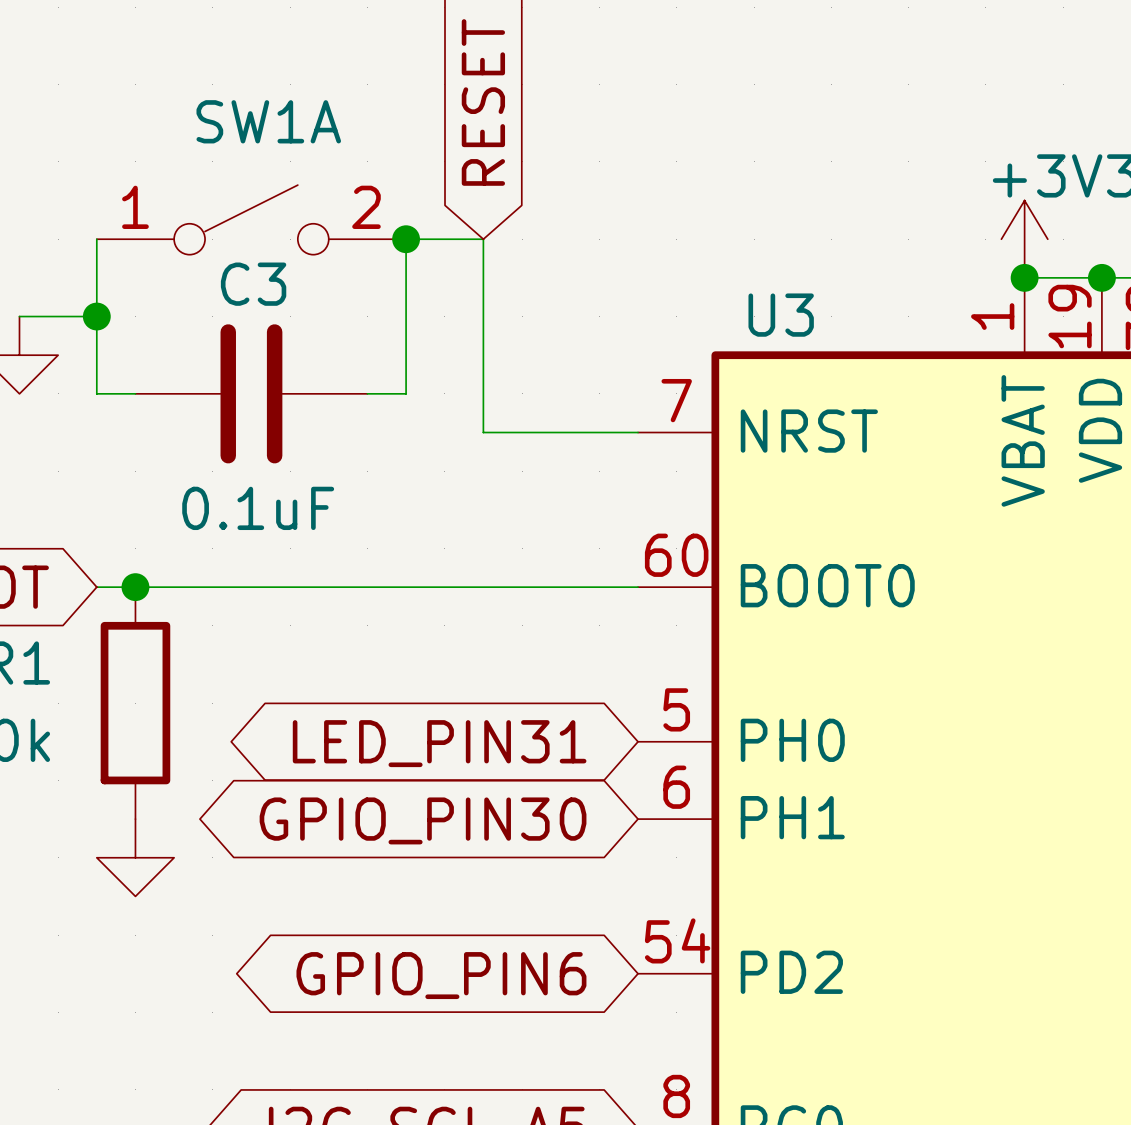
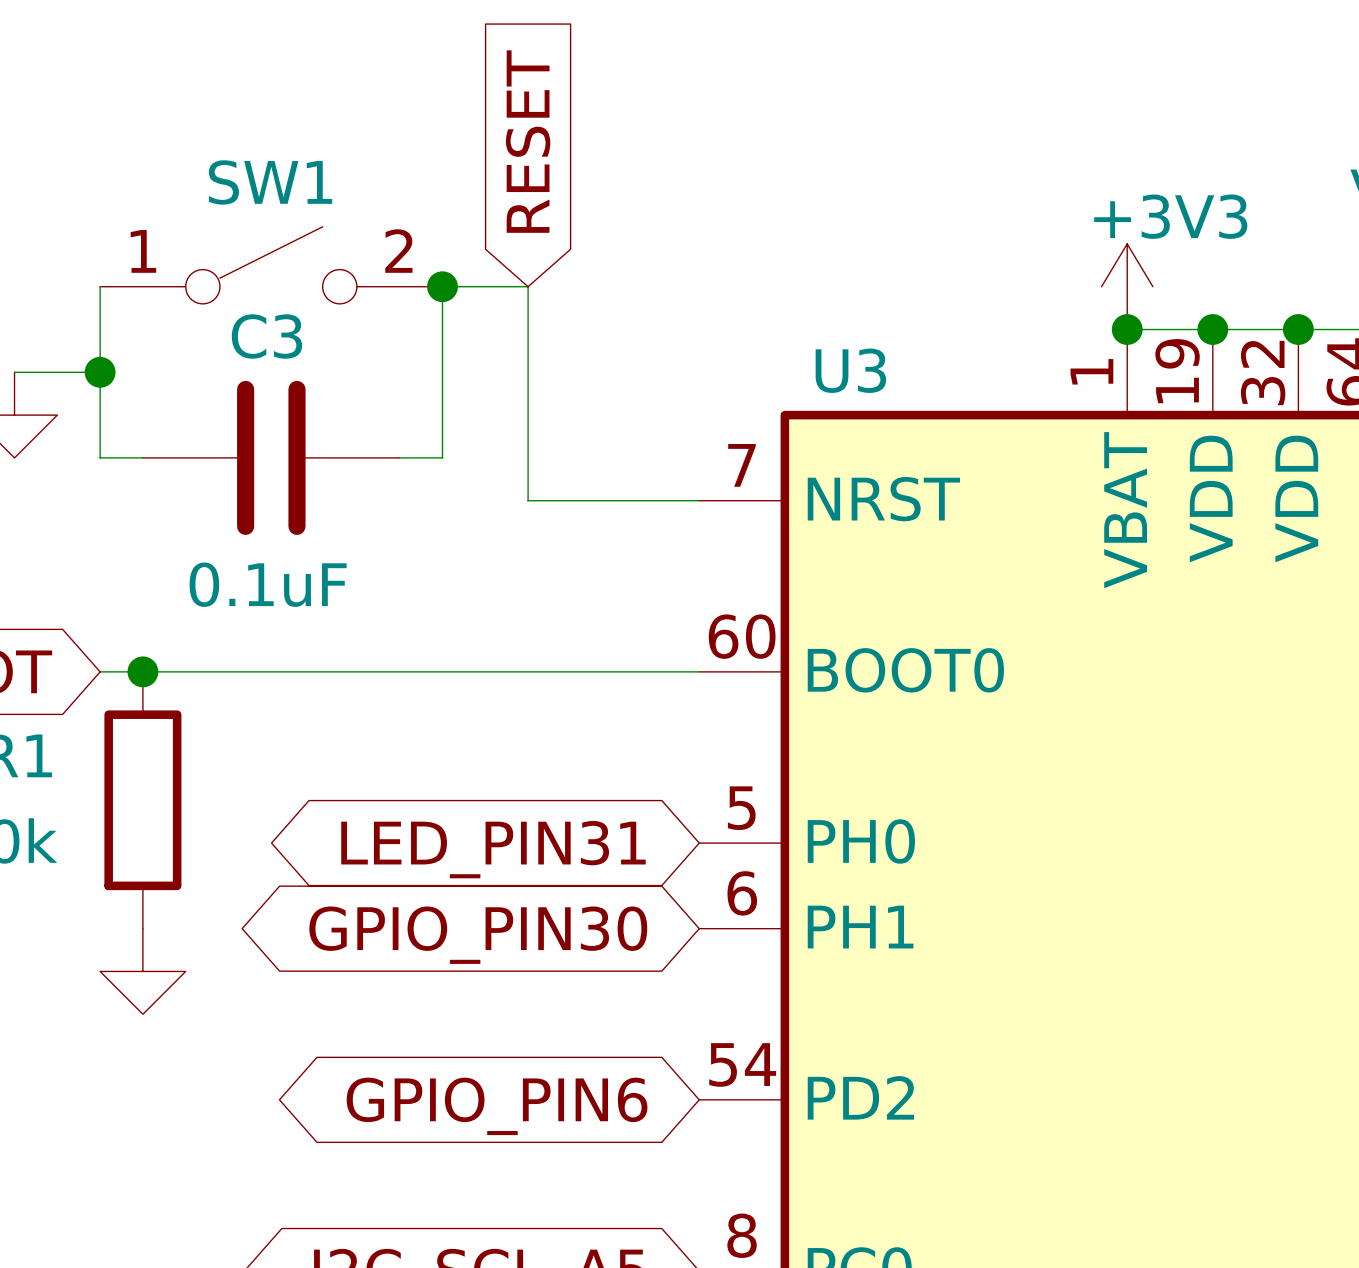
SW1A name: SW1A (268, 121) -> SW1 (270, 182)

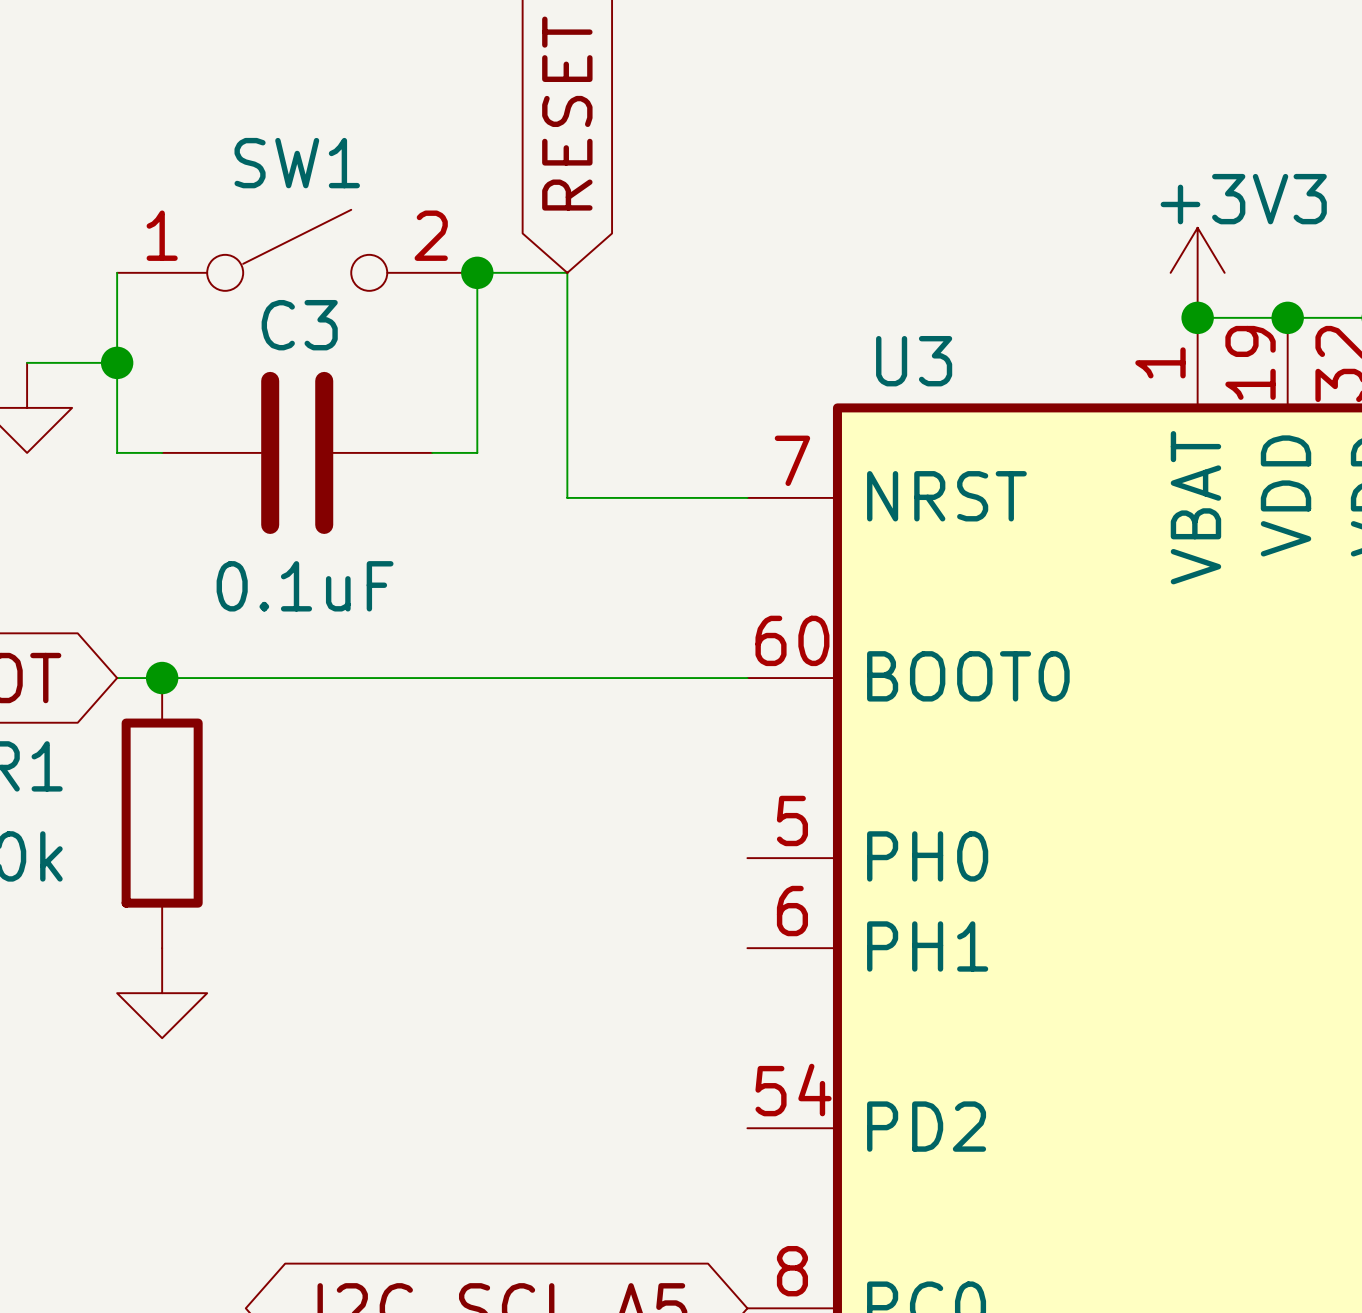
global label: LED_PIN31 (493, 849) -> none
global label: GPIO_PIN30 (478, 935) -> none
global label: GPIO_PIN6 (497, 1106) -> none

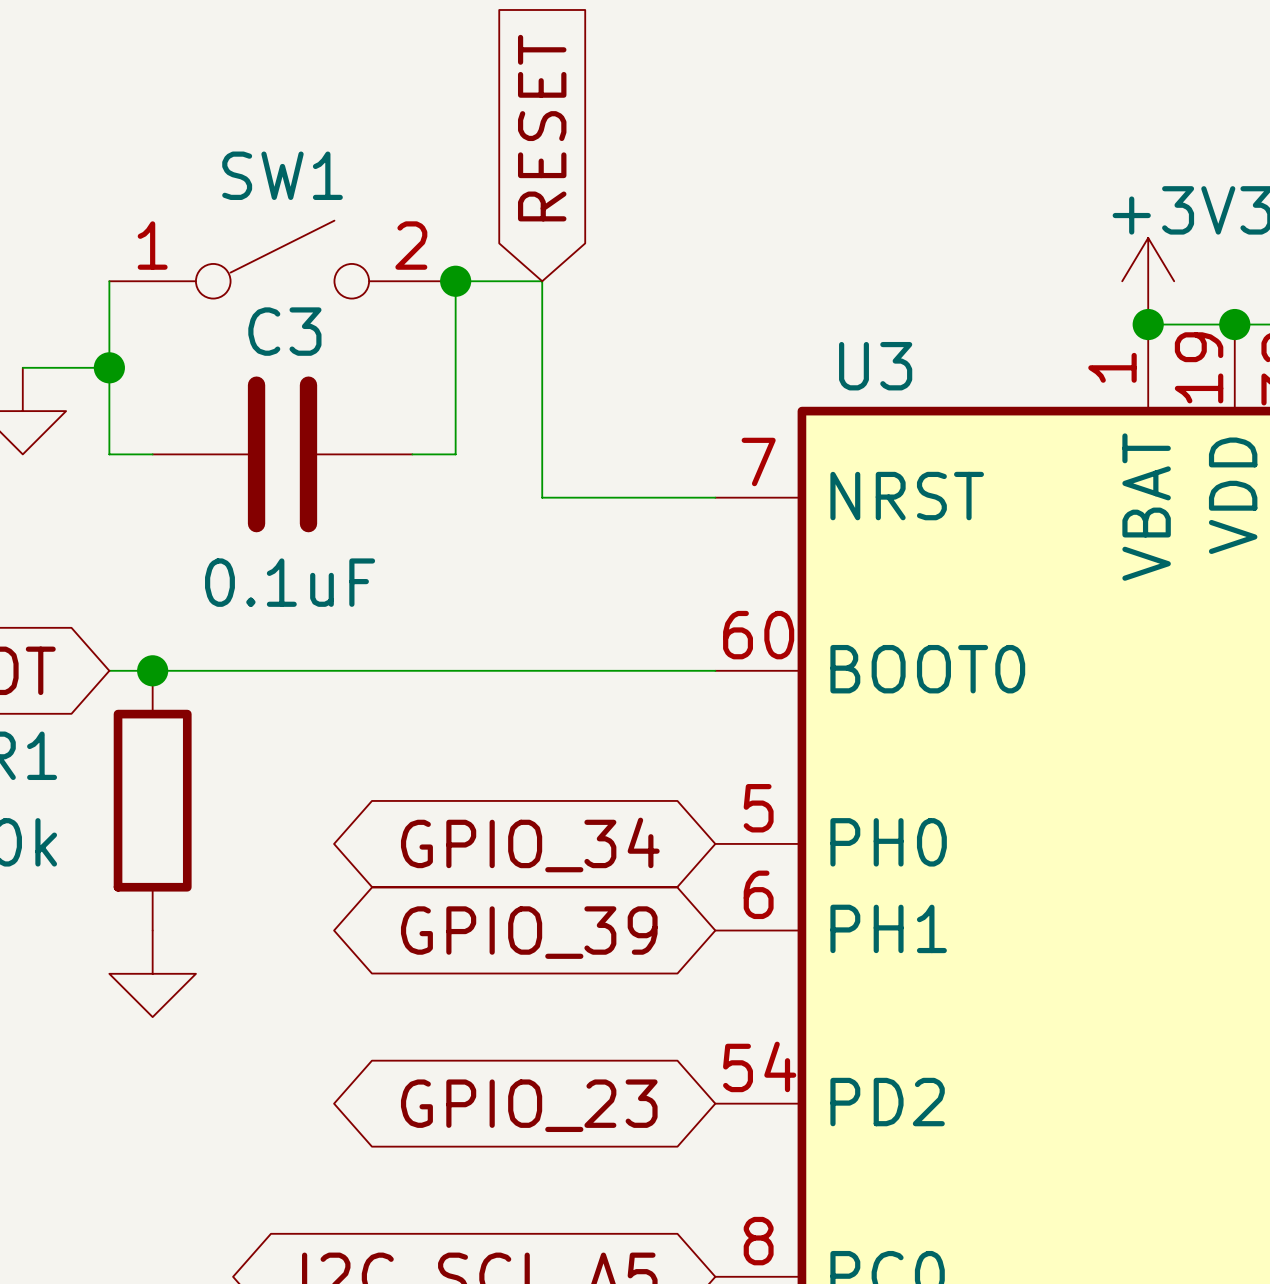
global label: none -> GPIO_34 (530, 844)
global label: none -> GPIO_39 (529, 932)
global label: none -> GPIO_23 (529, 1105)

